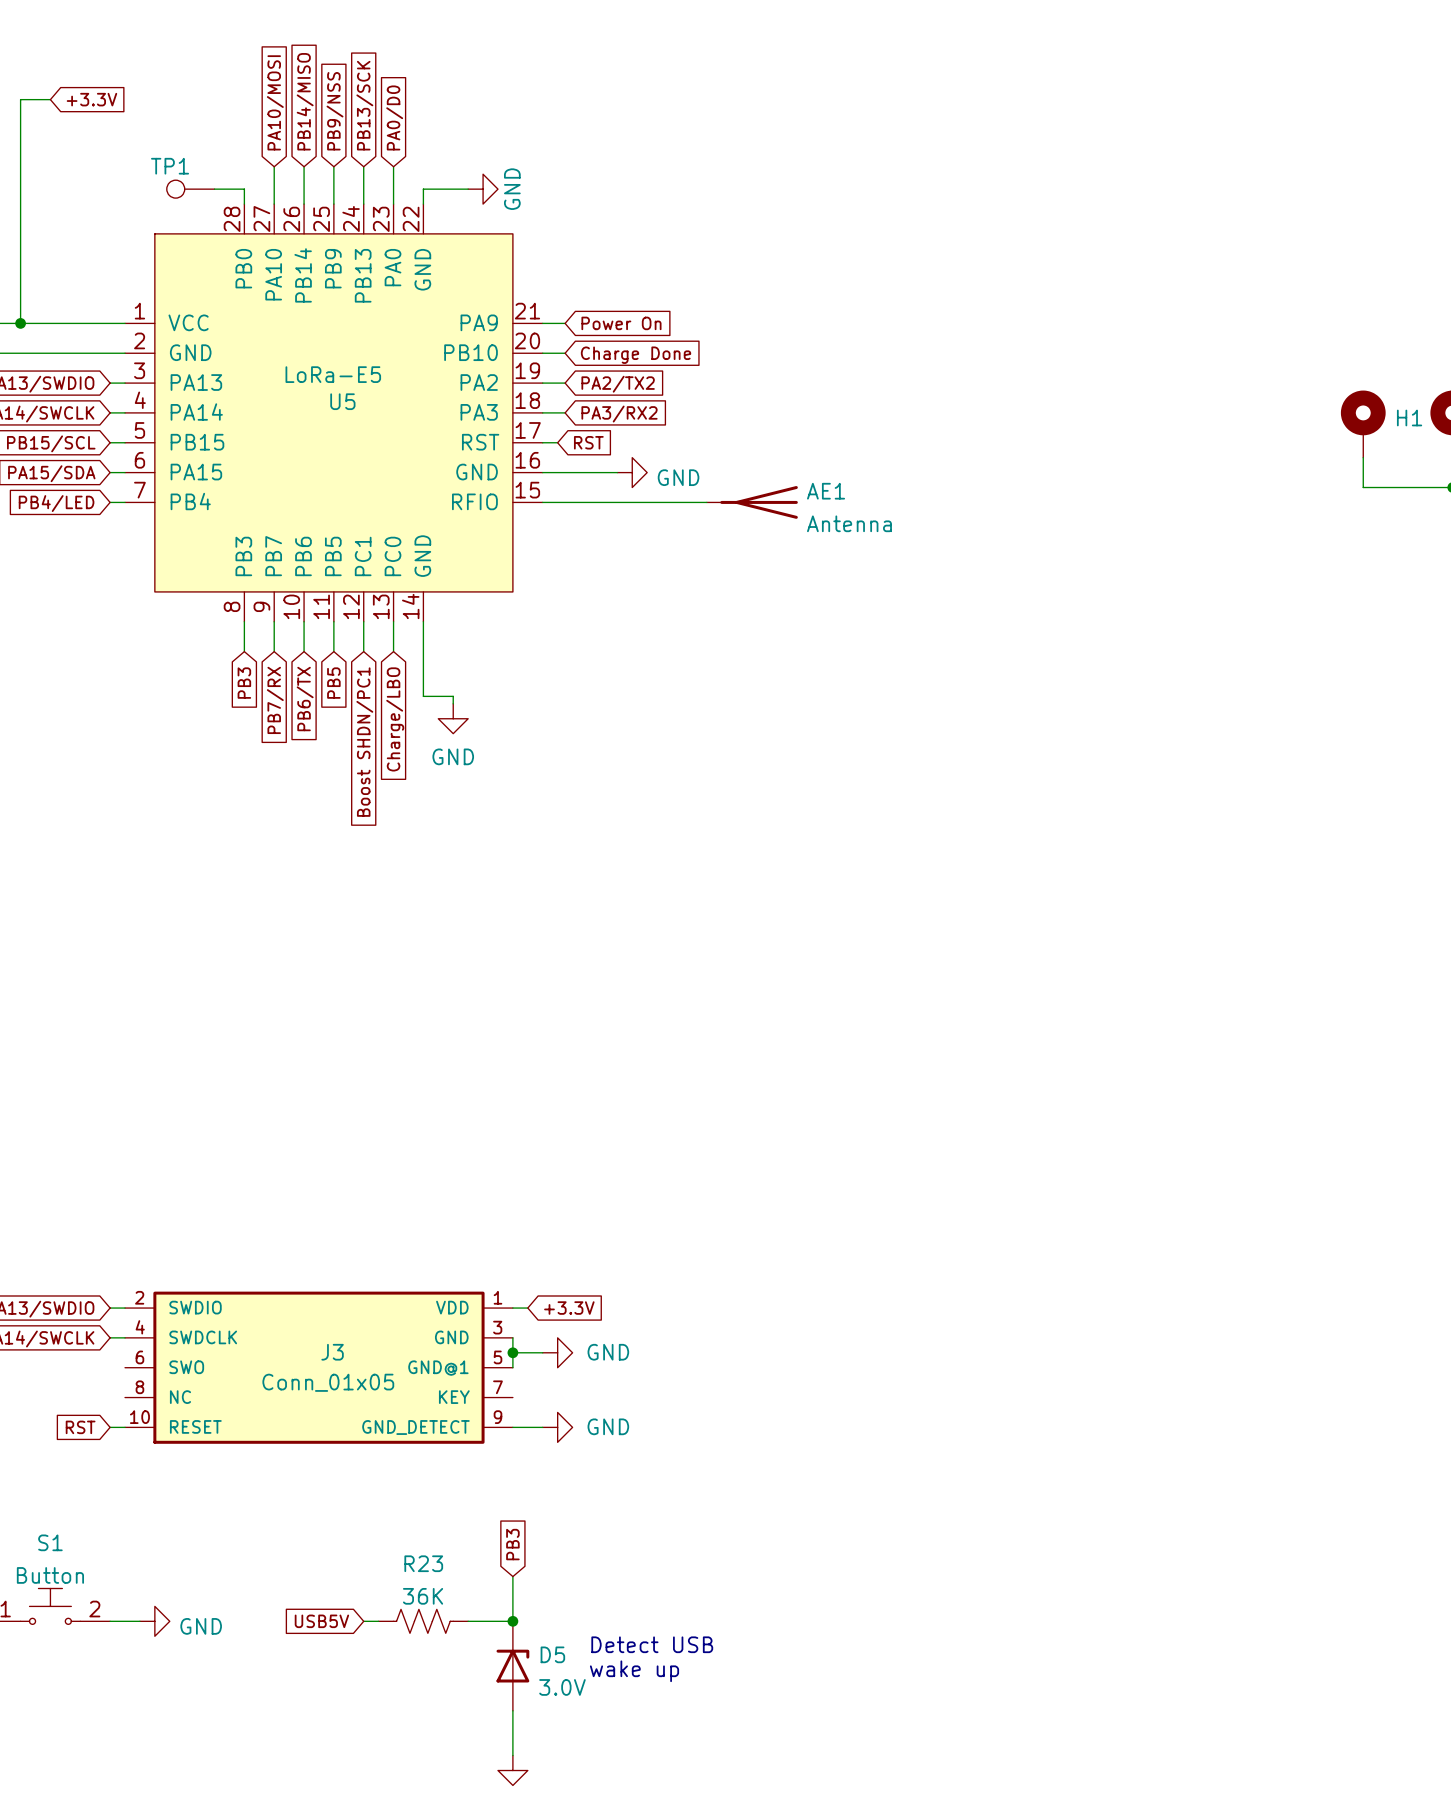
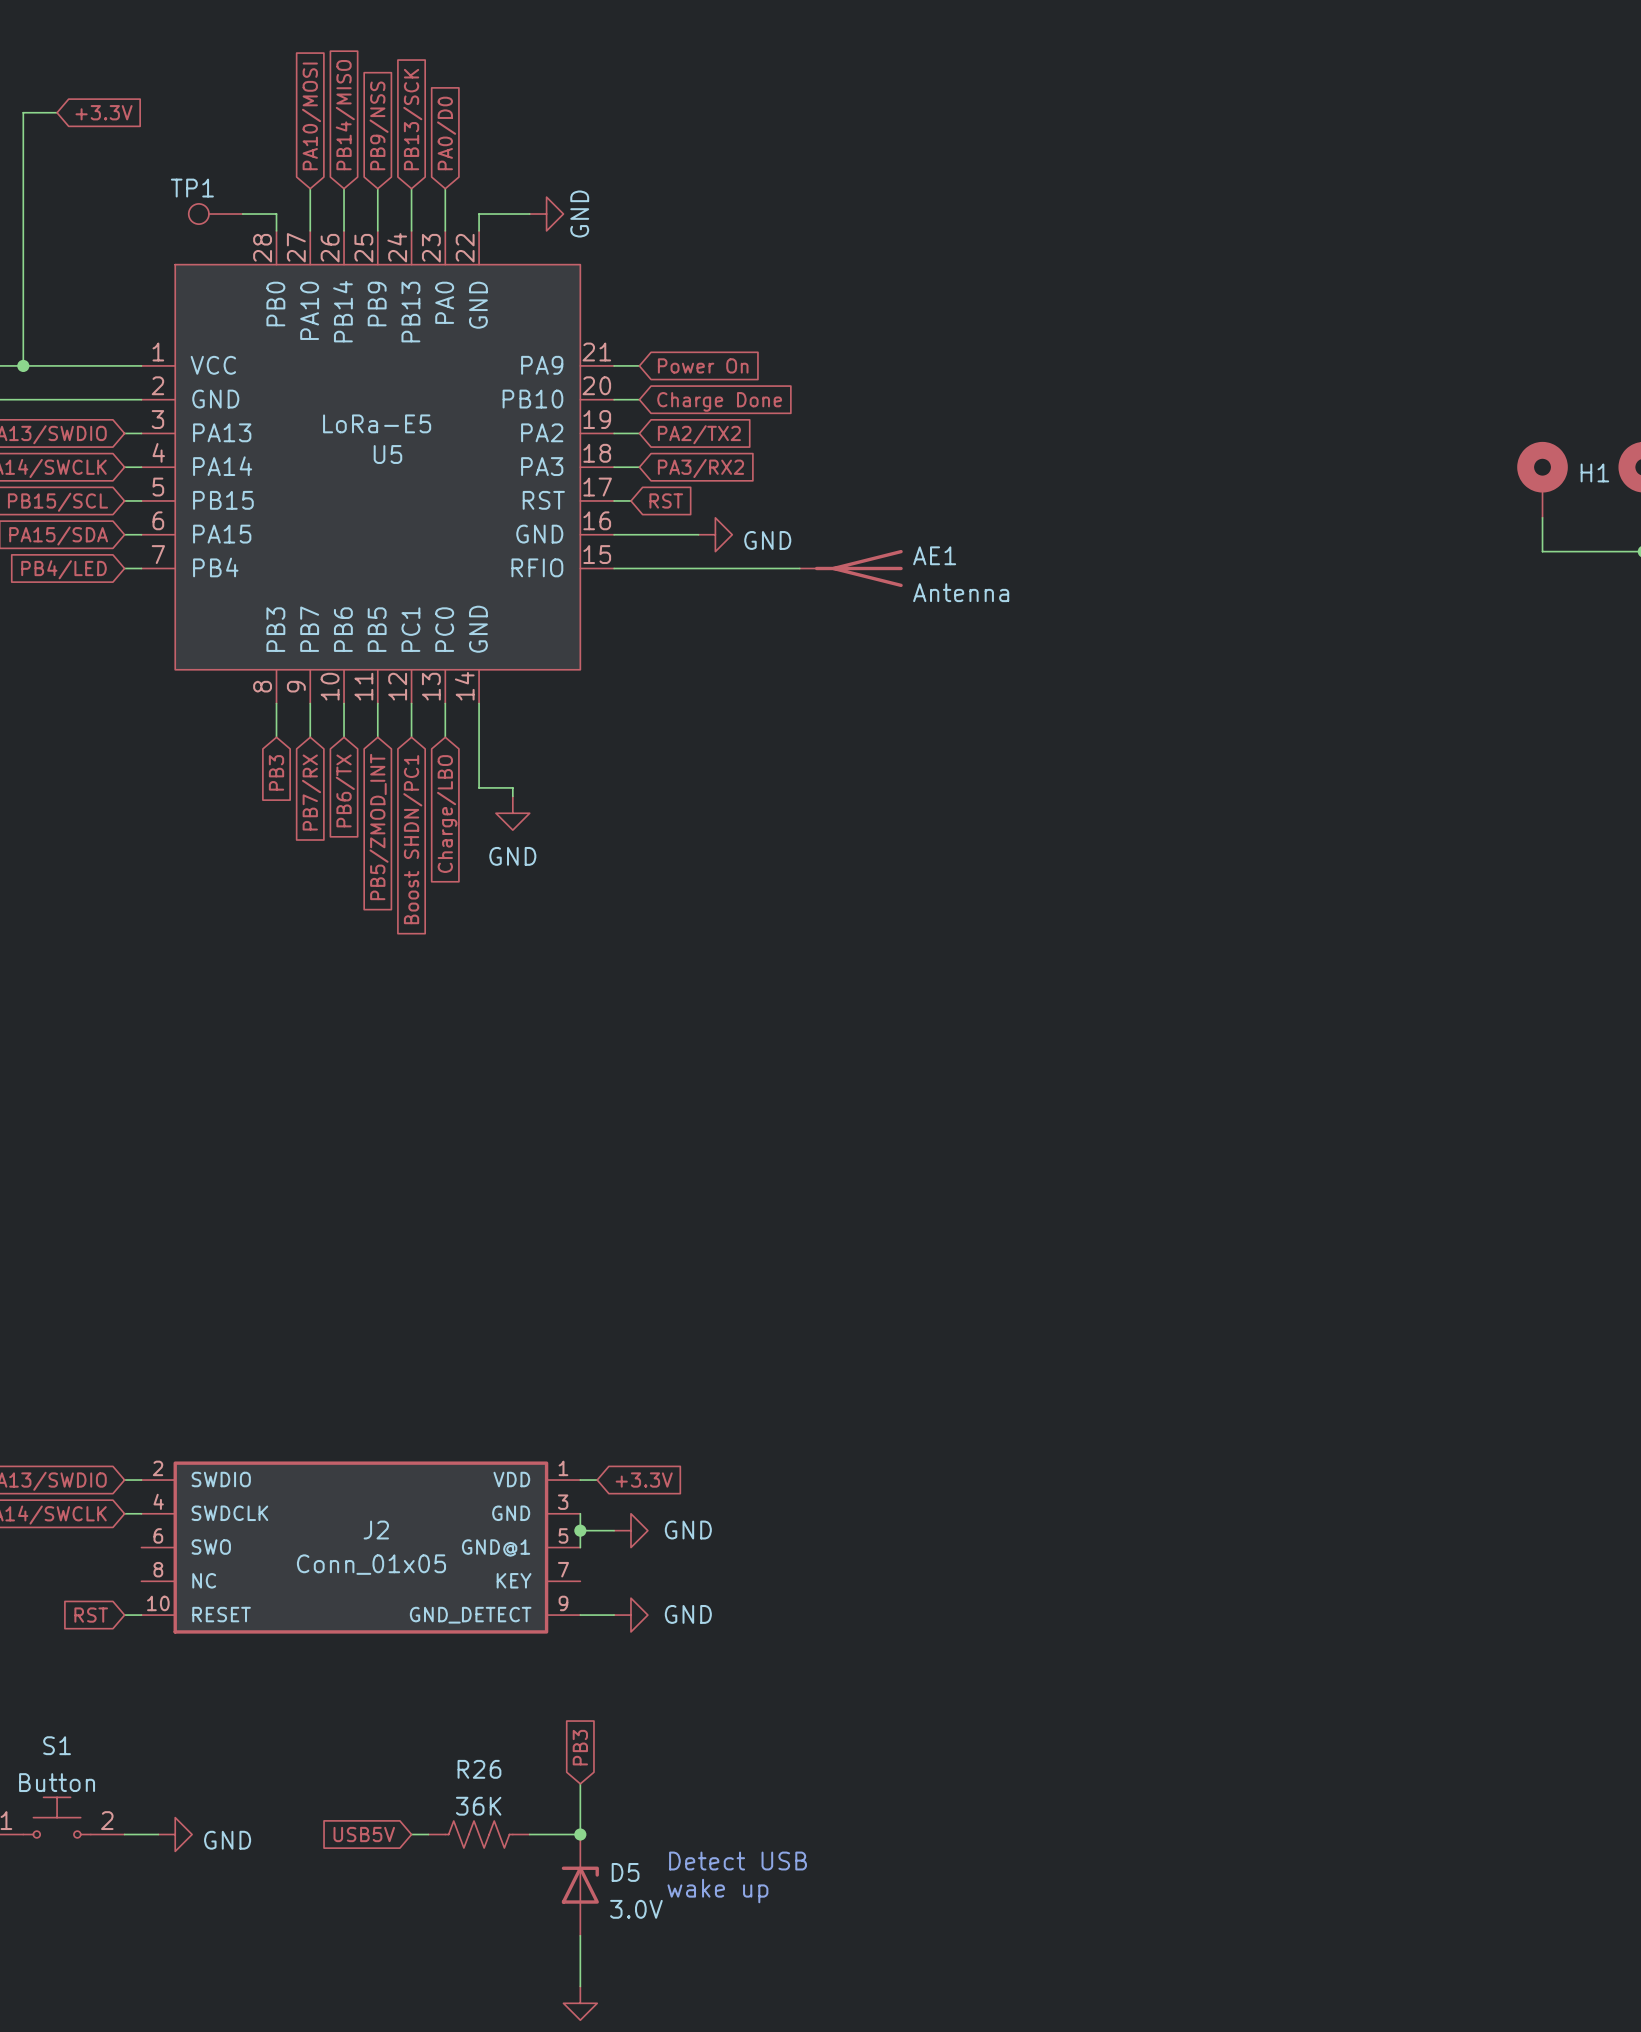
global label: PB5 (333, 683) -> PB5/ZMOD_INT (379, 827)
J3 name: J3 (332, 1352) -> J2 (376, 1530)
R23 name: R23 (423, 1563) -> R26 (479, 1769)

